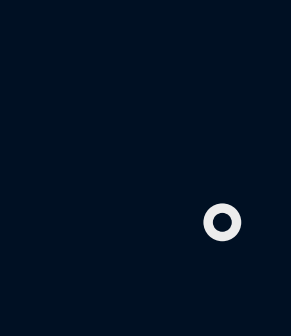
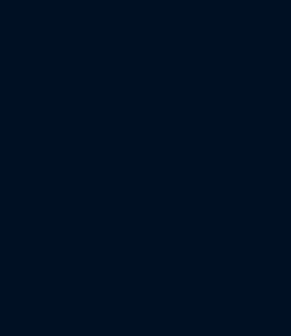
via: (222, 222) -> none

